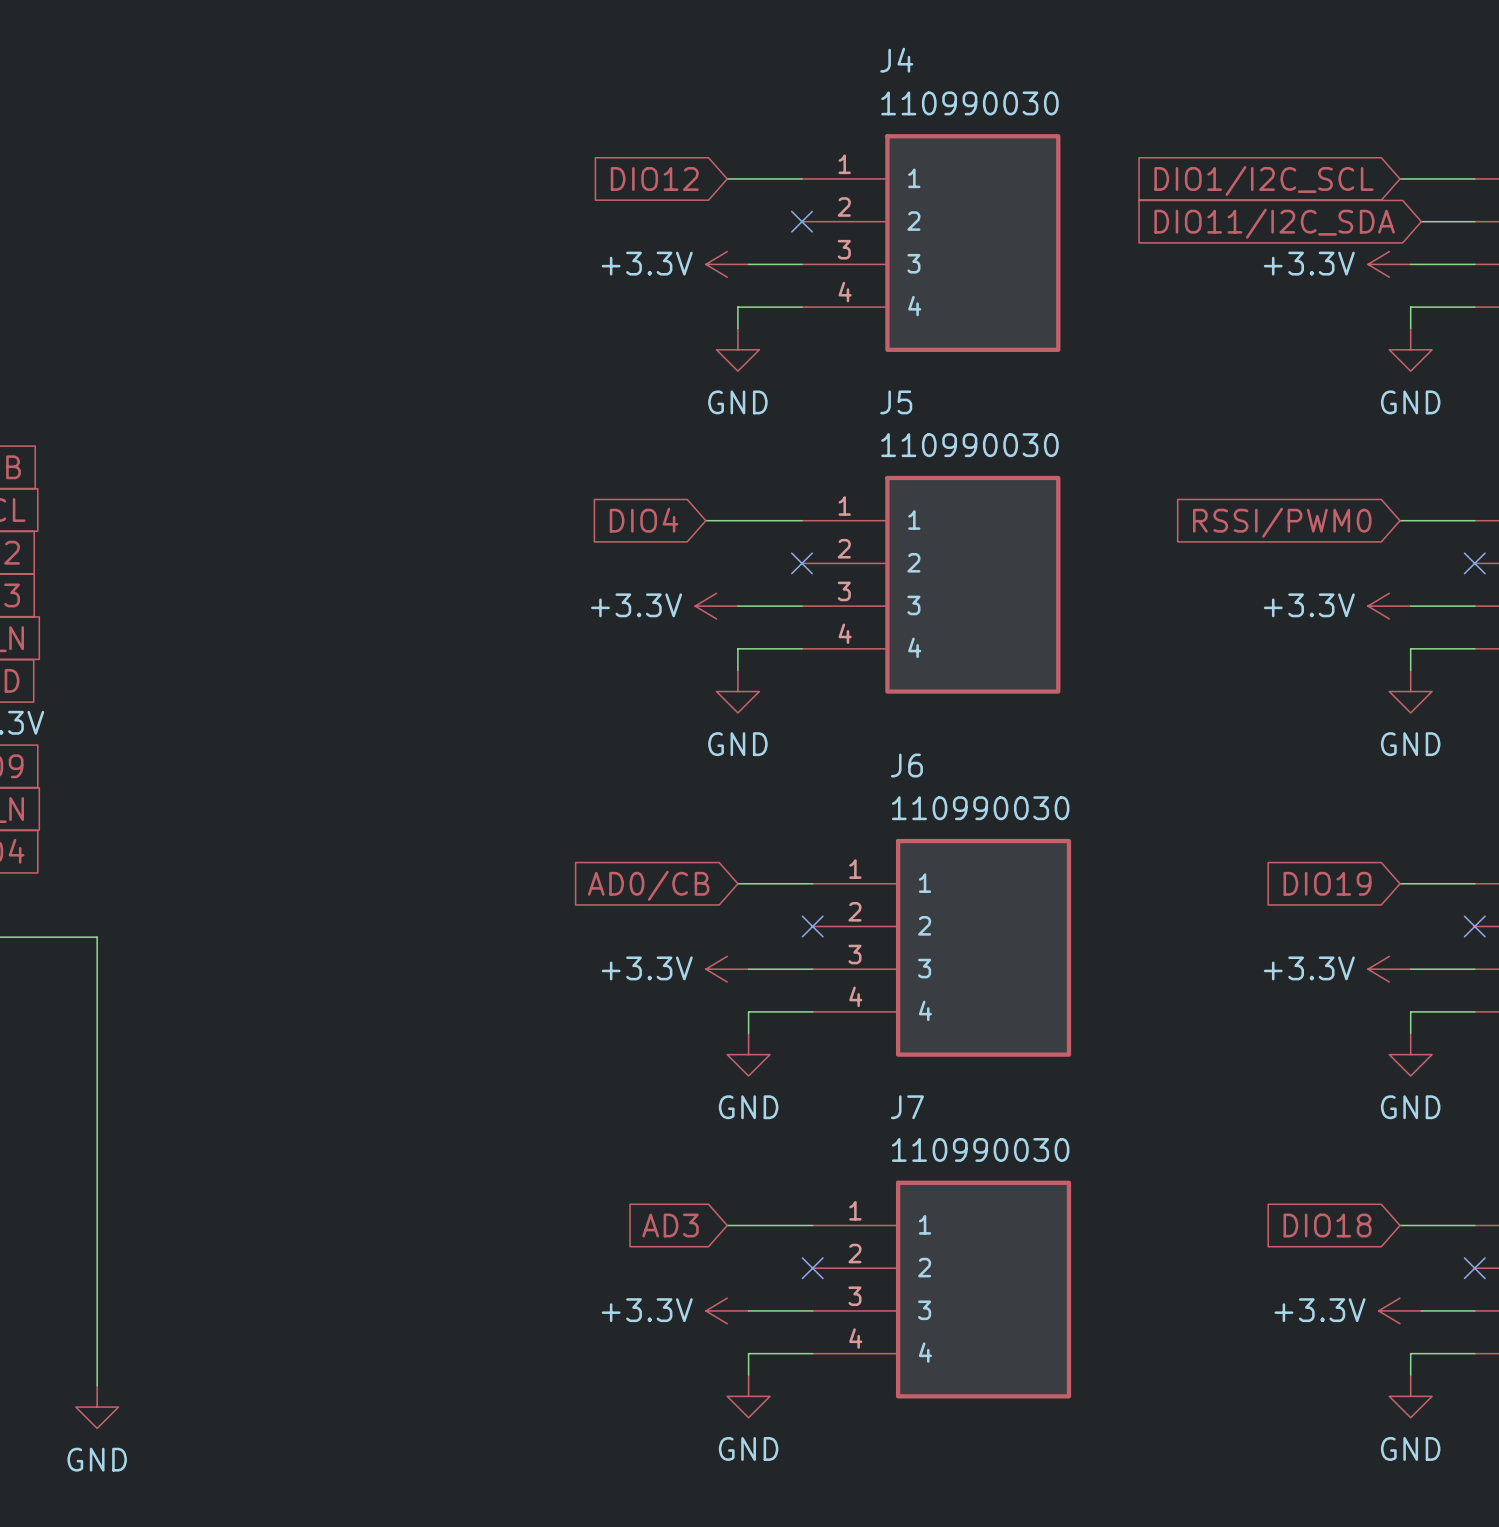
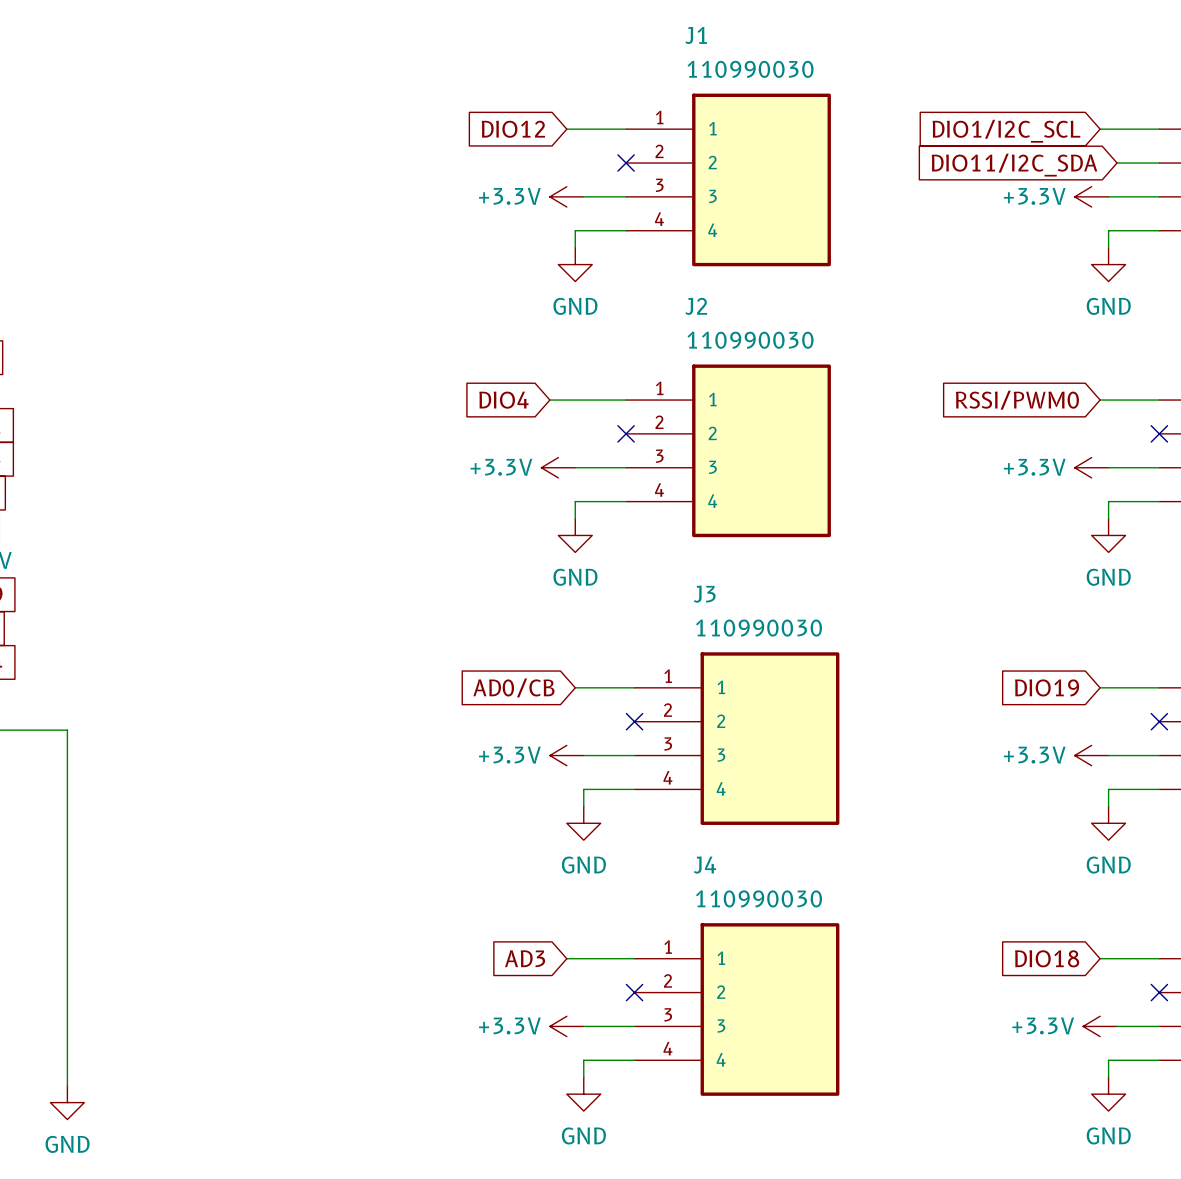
J4 name: J4 (896, 60) -> J1 (696, 35)
J5 name: J5 (896, 402) -> J2 (696, 306)
J6 name: J6 (906, 765) -> J3 (704, 594)
J7 name: J7 (907, 1107) -> J4 (704, 865)

